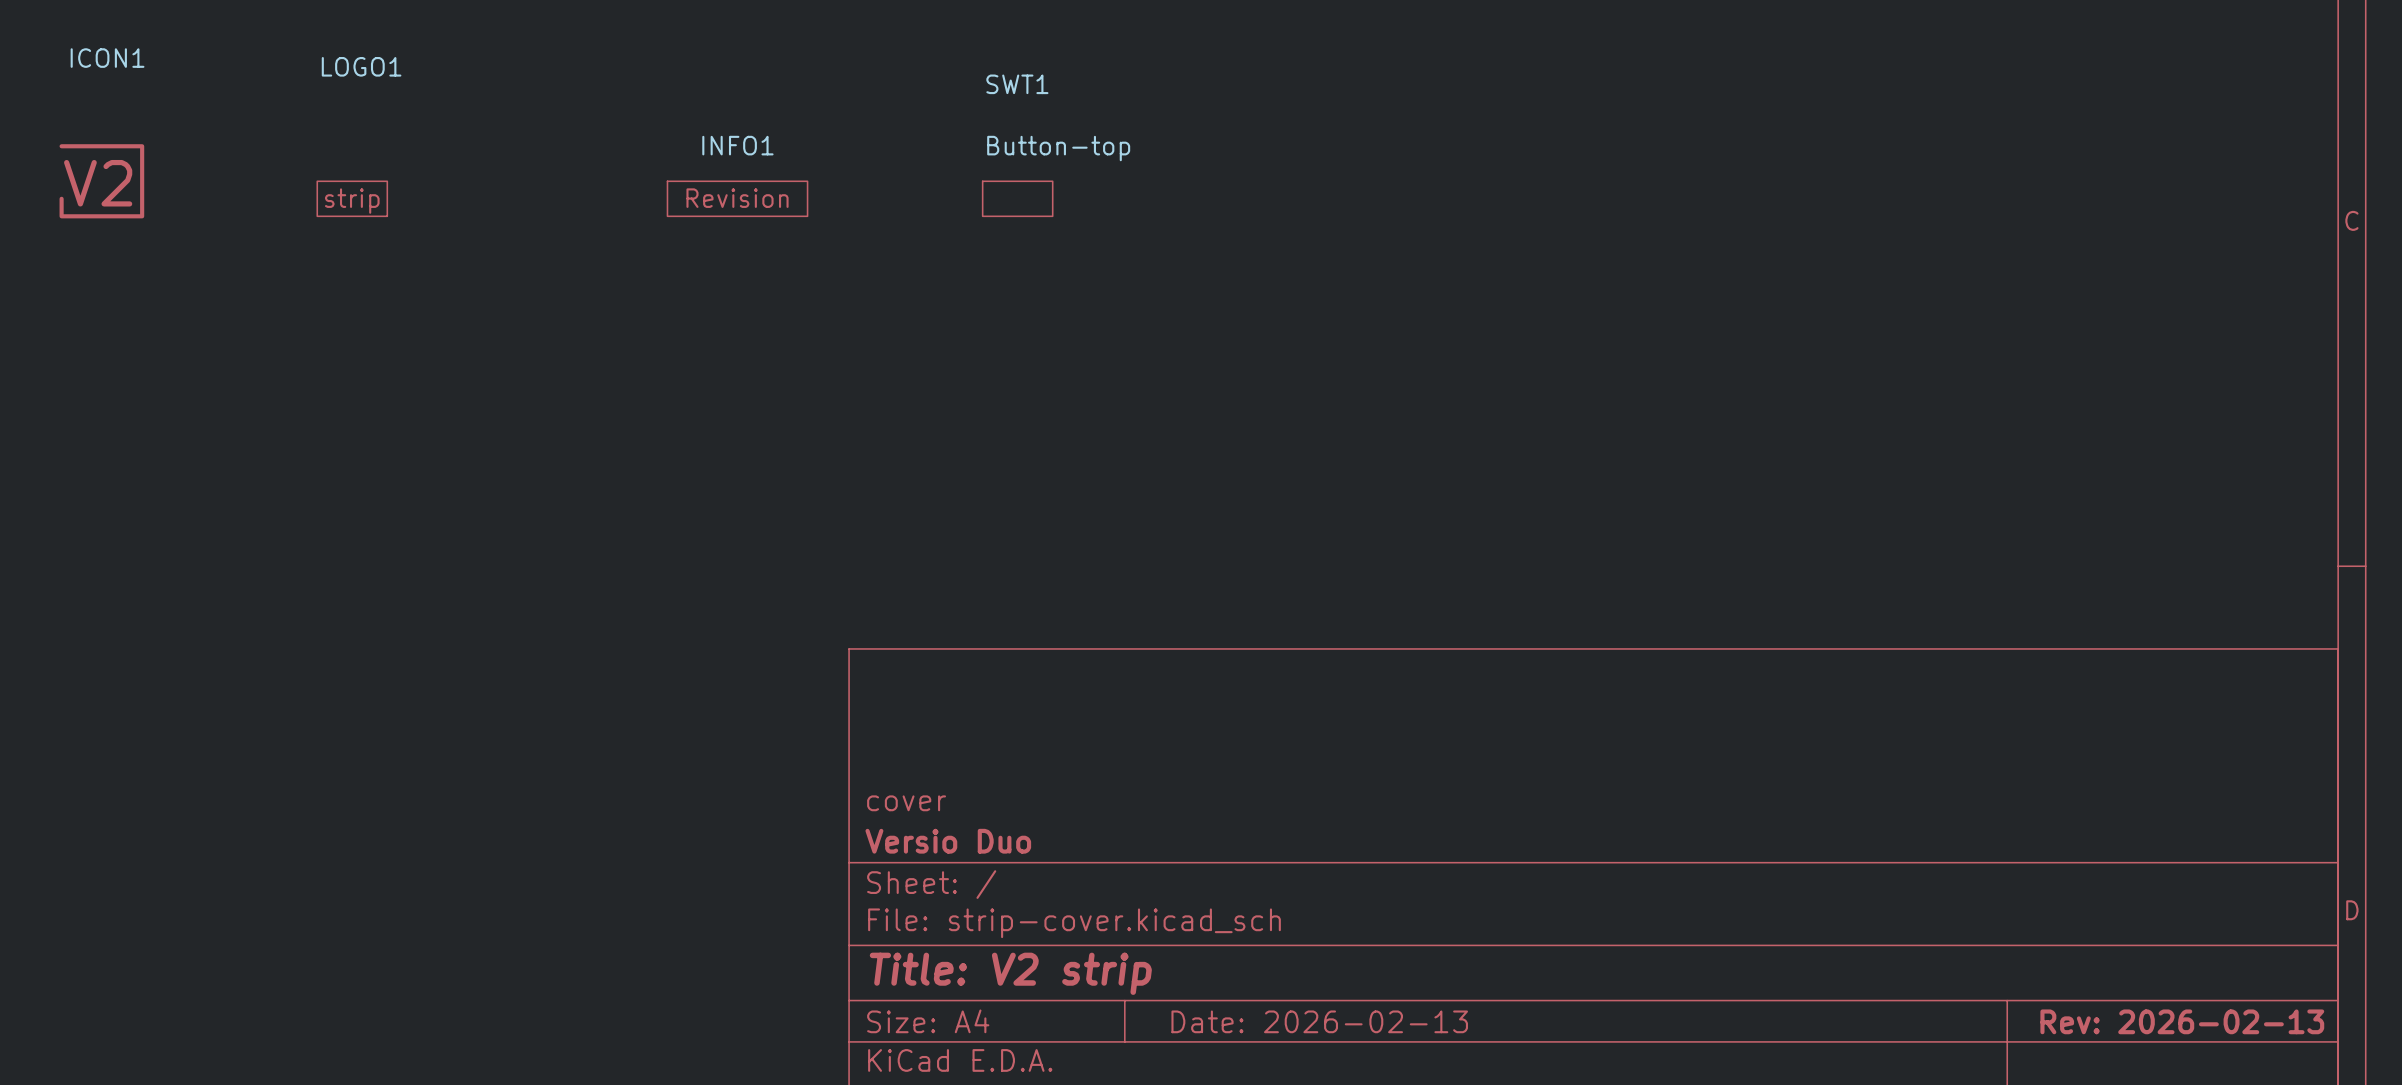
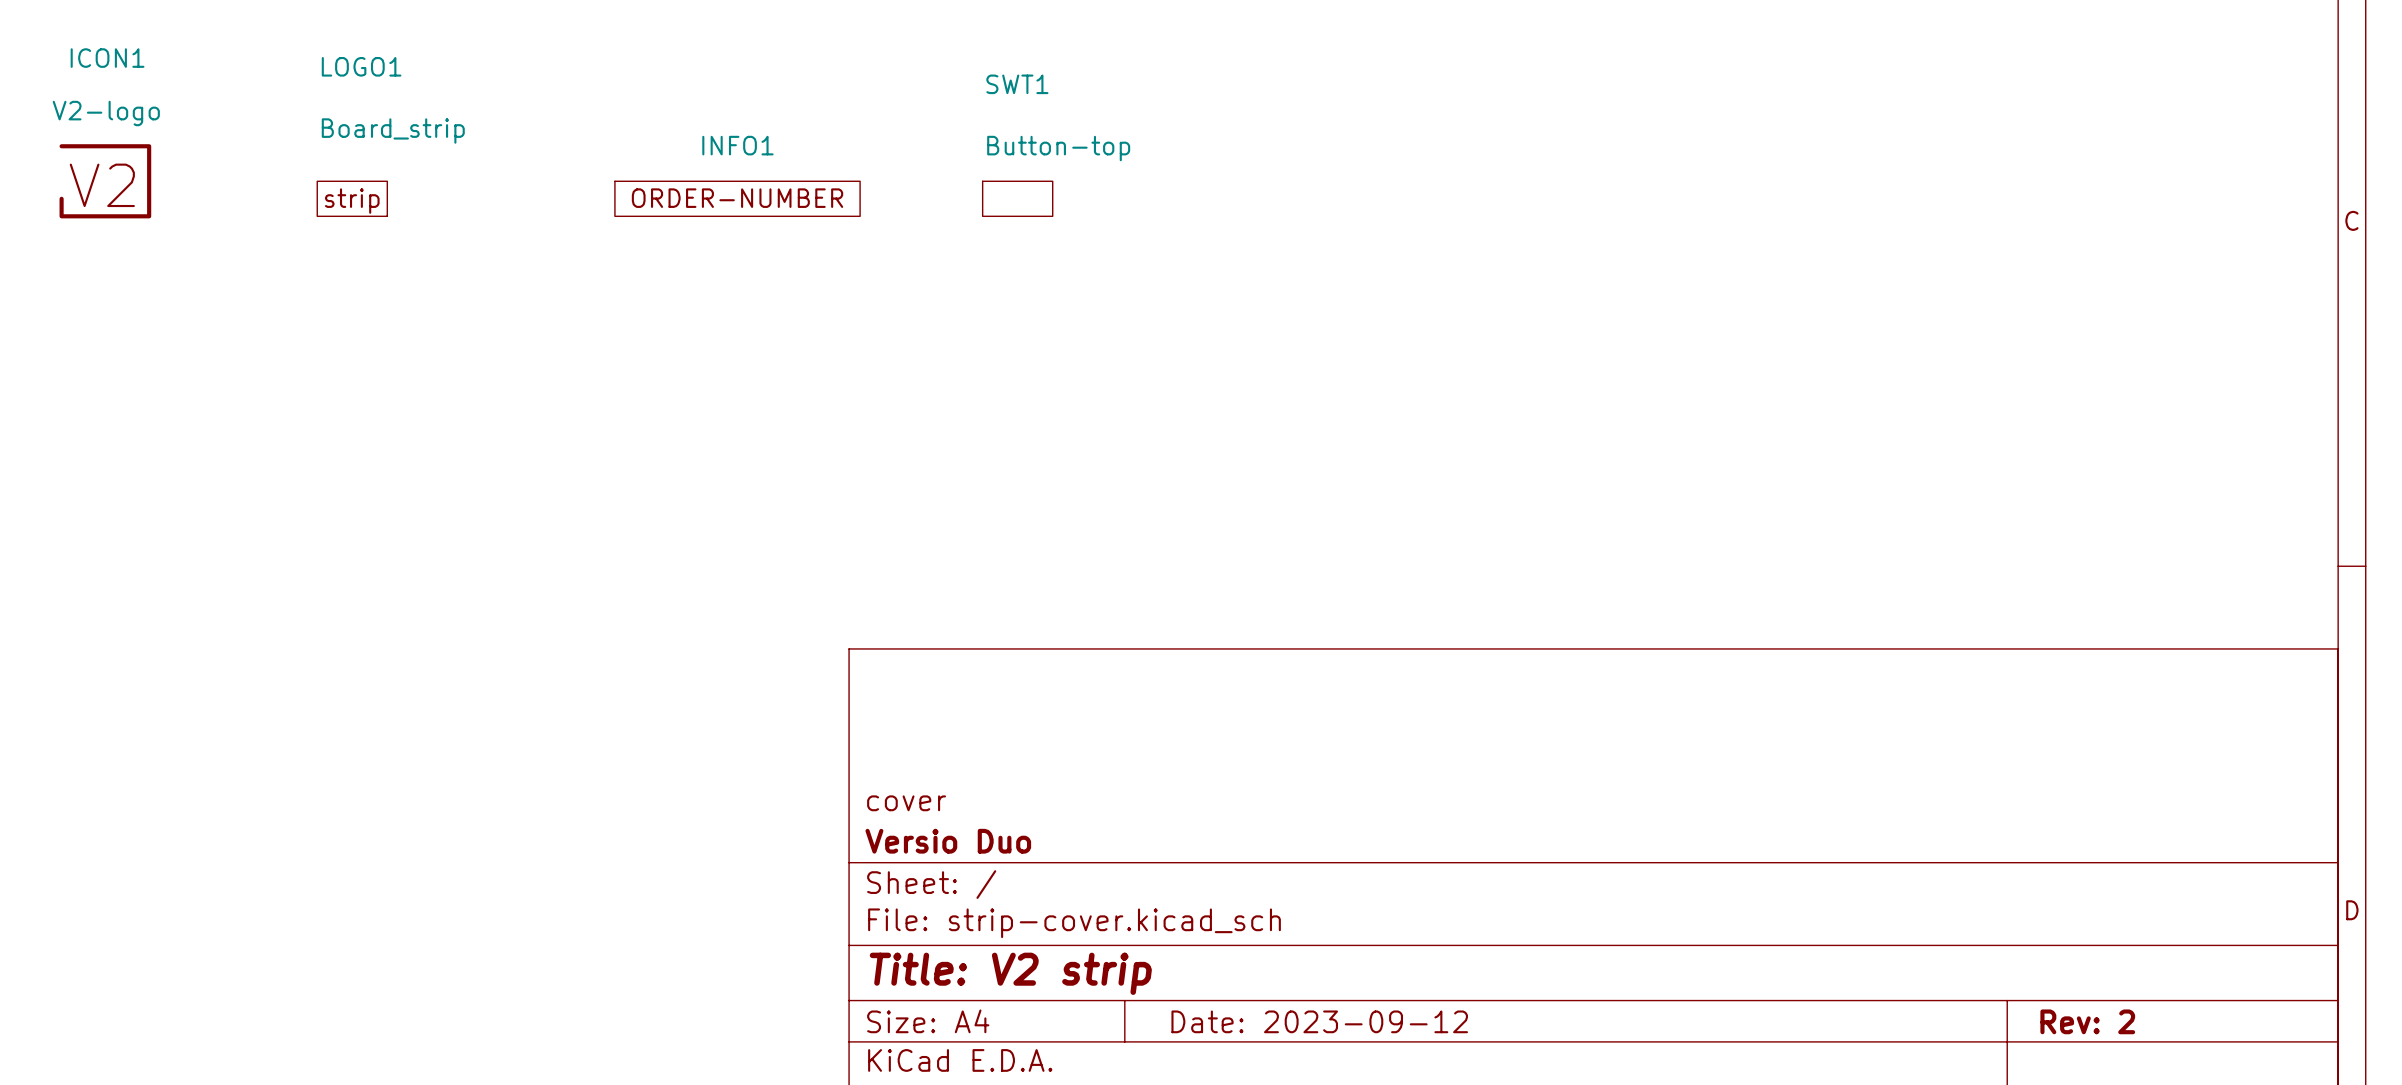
ICON1 value: none -> V2-logo (106, 113)
LOGO1 value: none -> Board_strip (393, 131)
ICON1 symbol: [59, 144, 145, 219] -> [59, 144, 152, 219]
INFO1 symbol: [667, 181, 808, 217] -> [614, 181, 861, 217]
title block: Date: 2026-02-13 (1319, 1021) -> Date: 2023-09-12 (1319, 1021)
title block: Rev: 2026-02-13 (2182, 1021) -> Rev: 2 (2087, 1021)

